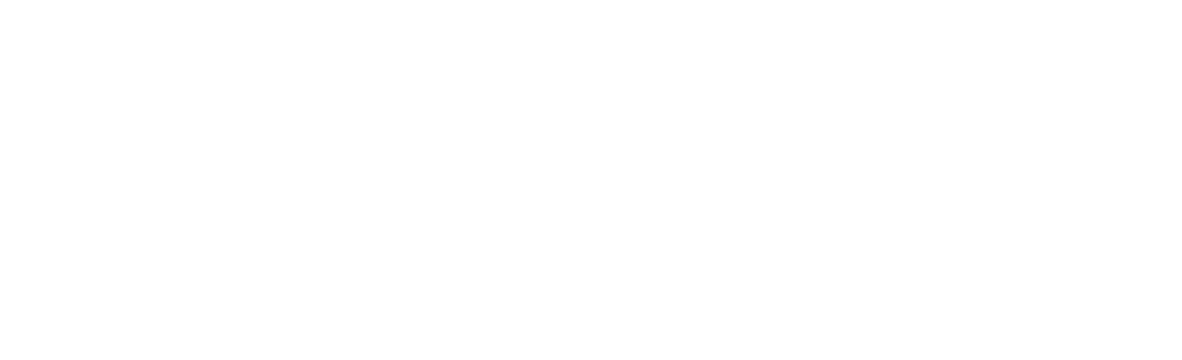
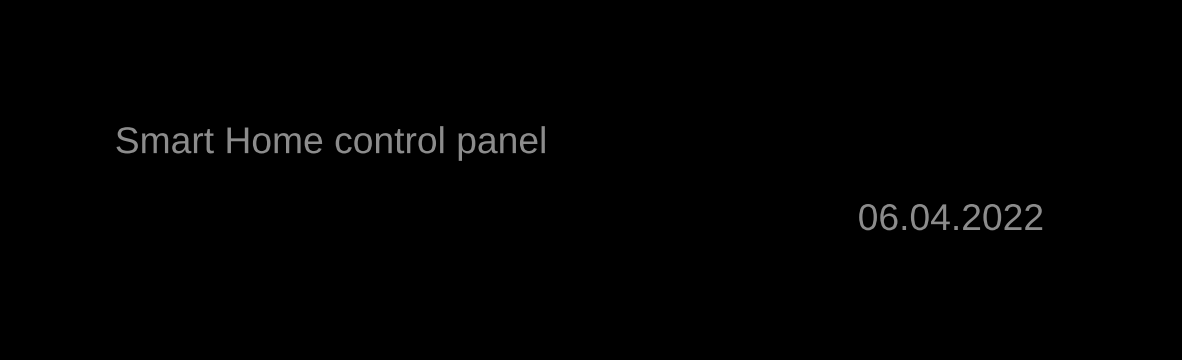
text: none -> Smart Home control panel (330, 143)
text: none -> 06.04.2022 (950, 217)

